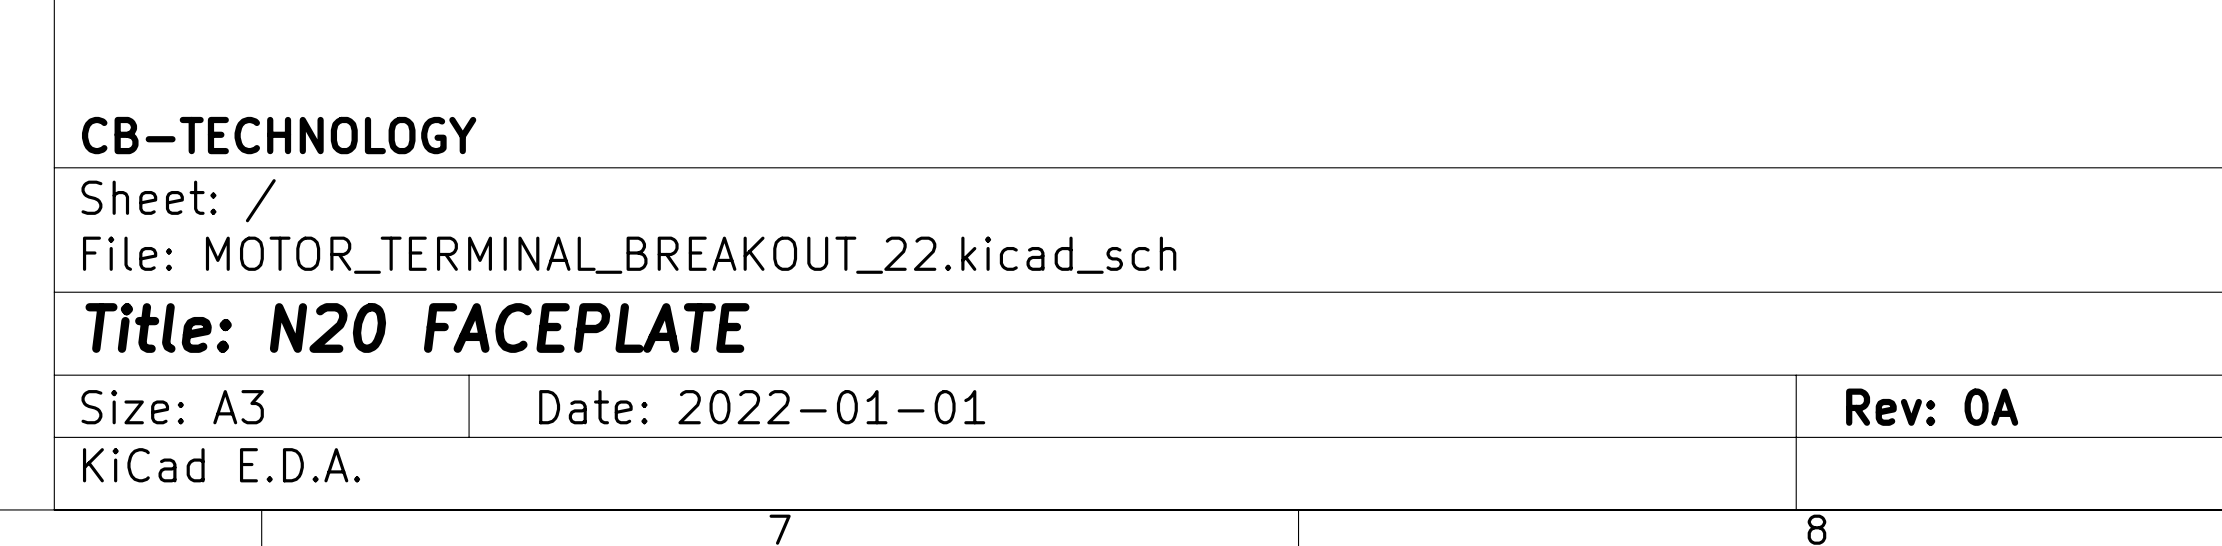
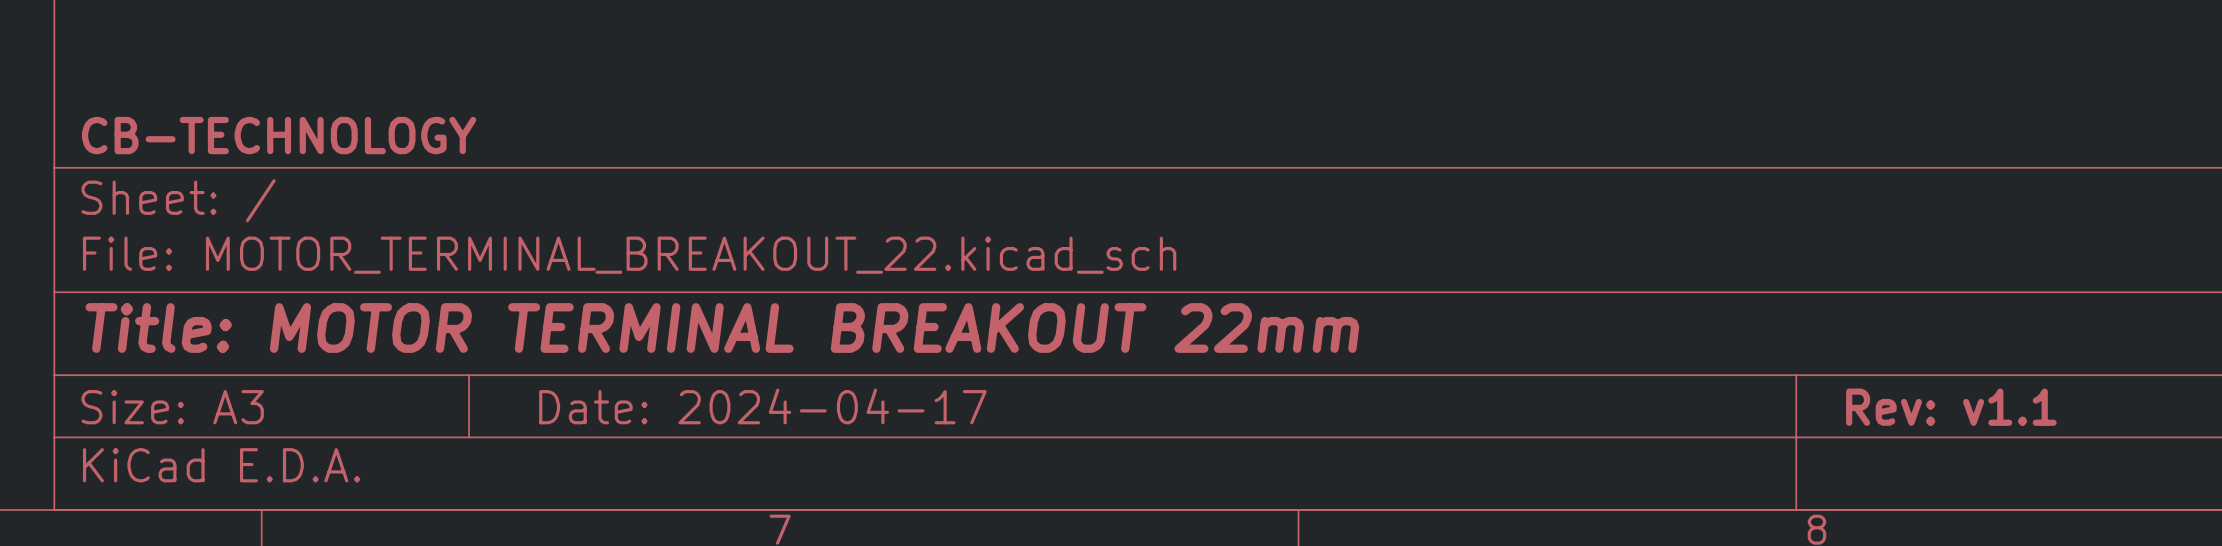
title block: Title: N20 FACEPLATE (417, 328) -> Title: MOTOR TERMINAL BREAKOUT 22mm (722, 328)
title block: Date: 2022-01-01 (762, 407) -> Date: 2024-04-17 (762, 406)
title block: Rev: 0A (1932, 407) -> Rev: v1.1 (1951, 407)

